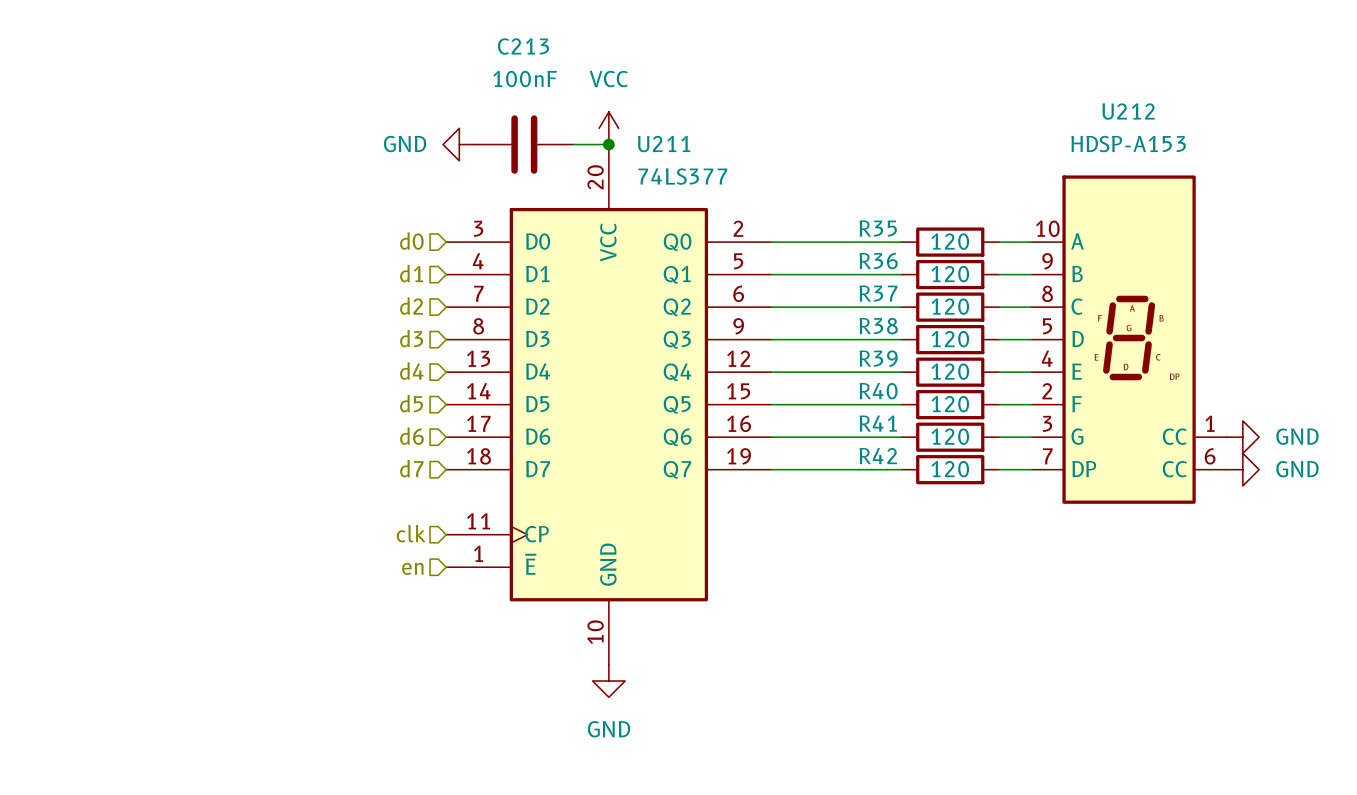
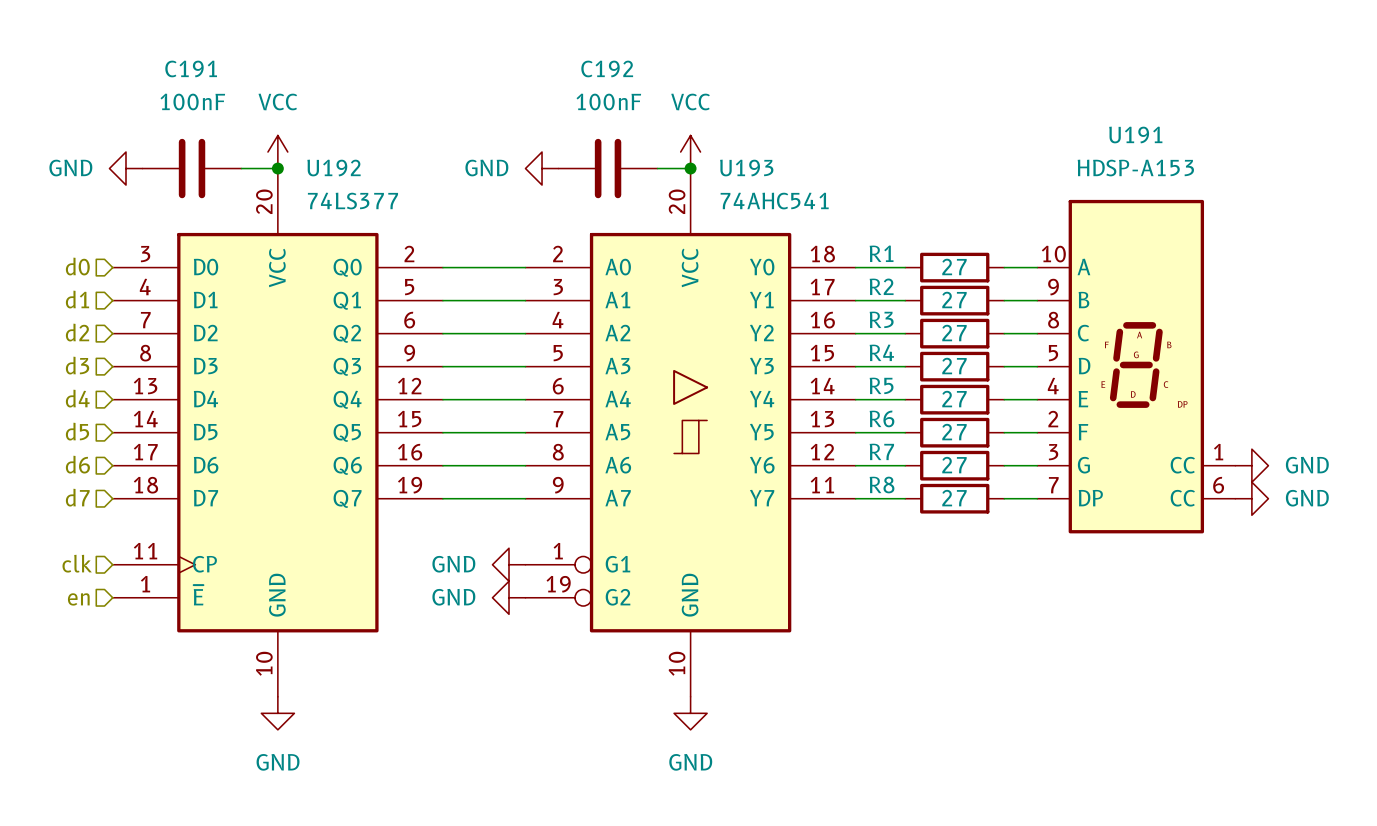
U212 name: U212 (1128, 111) -> U191 (1135, 134)
power symbol: none -> VCC (277, 152)
power symbol position: VCC (608, 128) -> VCC (690, 152)
power symbol: none -> GND (125, 168)
C191: none -> 100nF (192, 168)
wire: none -> (241, 168) (277, 168)
junction: none -> (277, 168)
power symbol position: GND (459, 144) -> GND (542, 168)
C213: 100nF (524, 144) -> none
junction: (608, 144) -> none
C192: none -> 100nF (608, 168)
wire: none -> (657, 168) (690, 168)
junction: none -> (690, 168)
R35 name: R35 (878, 228) -> R1 (881, 253)
hierarchical label: none -> d0 (77, 266)
hierarchical label: d0 (411, 241) -> none
R35 value: 120 (950, 241) -> 27 (954, 266)
R36 name: R36 (878, 261) -> R2 (881, 286)
hierarchical label: none -> d1 (77, 299)
hierarchical label: d1 (411, 273) -> none
R36 value: 120 (950, 274) -> 27 (954, 300)
R37 name: R37 (878, 293) -> R3 (881, 319)
hierarchical label: none -> d2 (77, 332)
hierarchical label: d2 (411, 306) -> none
R37 value: 120 (950, 306) -> 27 (954, 333)
R38 name: R38 (878, 326) -> R4 (881, 352)
hierarchical label: none -> d3 (77, 365)
hierarchical label: d3 (411, 338) -> none
R38 value: 120 (950, 339) -> 27 (954, 366)
R39 name: R39 (878, 358) -> R5 (881, 385)
hierarchical label: none -> d4 (77, 398)
hierarchical label: d4 (411, 371) -> none
R39 value: 120 (950, 371) -> 27 (954, 399)
R40 name: R40 (878, 391) -> R6 (882, 418)
hierarchical label: none -> d5 (77, 431)
hierarchical label: d5 (411, 403) -> none
U192: none -> 74LS377 (277, 432)
U211: 74LS377 (608, 404) -> none
U193: none -> 74AHC541 (690, 432)
R40 value: 120 (950, 404) -> 27 (954, 432)
R41 name: R41 (878, 423) -> R7 (881, 451)
hierarchical label: none -> d6 (77, 464)
hierarchical label: d6 (411, 436) -> none
R41 value: 120 (950, 436) -> 27 (954, 465)
R42 name: R42 (878, 456) -> R8 (882, 485)
hierarchical label: none -> d7 (77, 497)
hierarchical label: d7 (411, 468) -> none
R42 value: 120 (950, 469) -> 27 (954, 498)
hierarchical label: none -> clk (77, 563)
hierarchical label: clk (411, 533) -> none
power symbol: none -> GND (509, 564)
power symbol: none -> GND (509, 597)
hierarchical label: none -> en (78, 599)
hierarchical label: en (412, 568) -> none
power symbol: none -> GND (277, 713)
power symbol: GND (608, 681) -> none
power symbol: none -> GND (690, 713)

